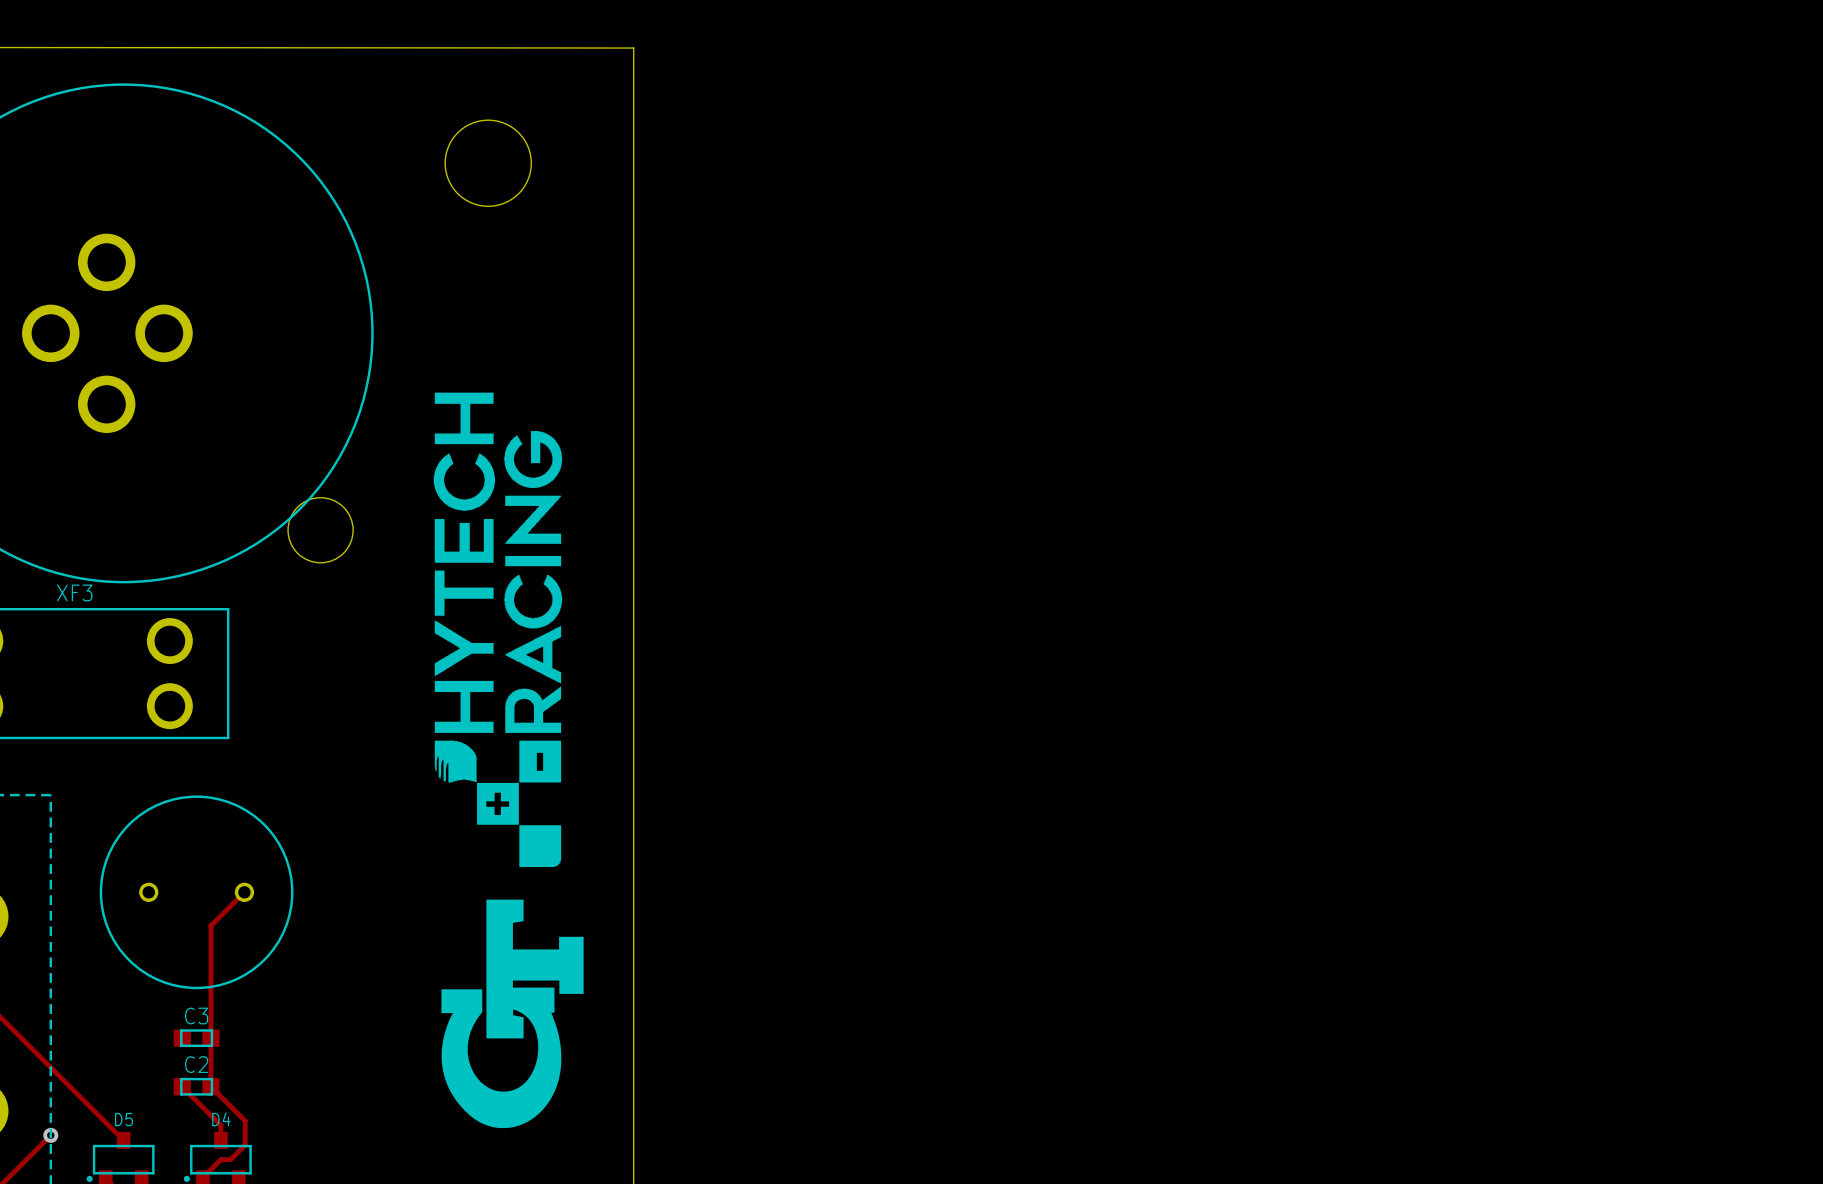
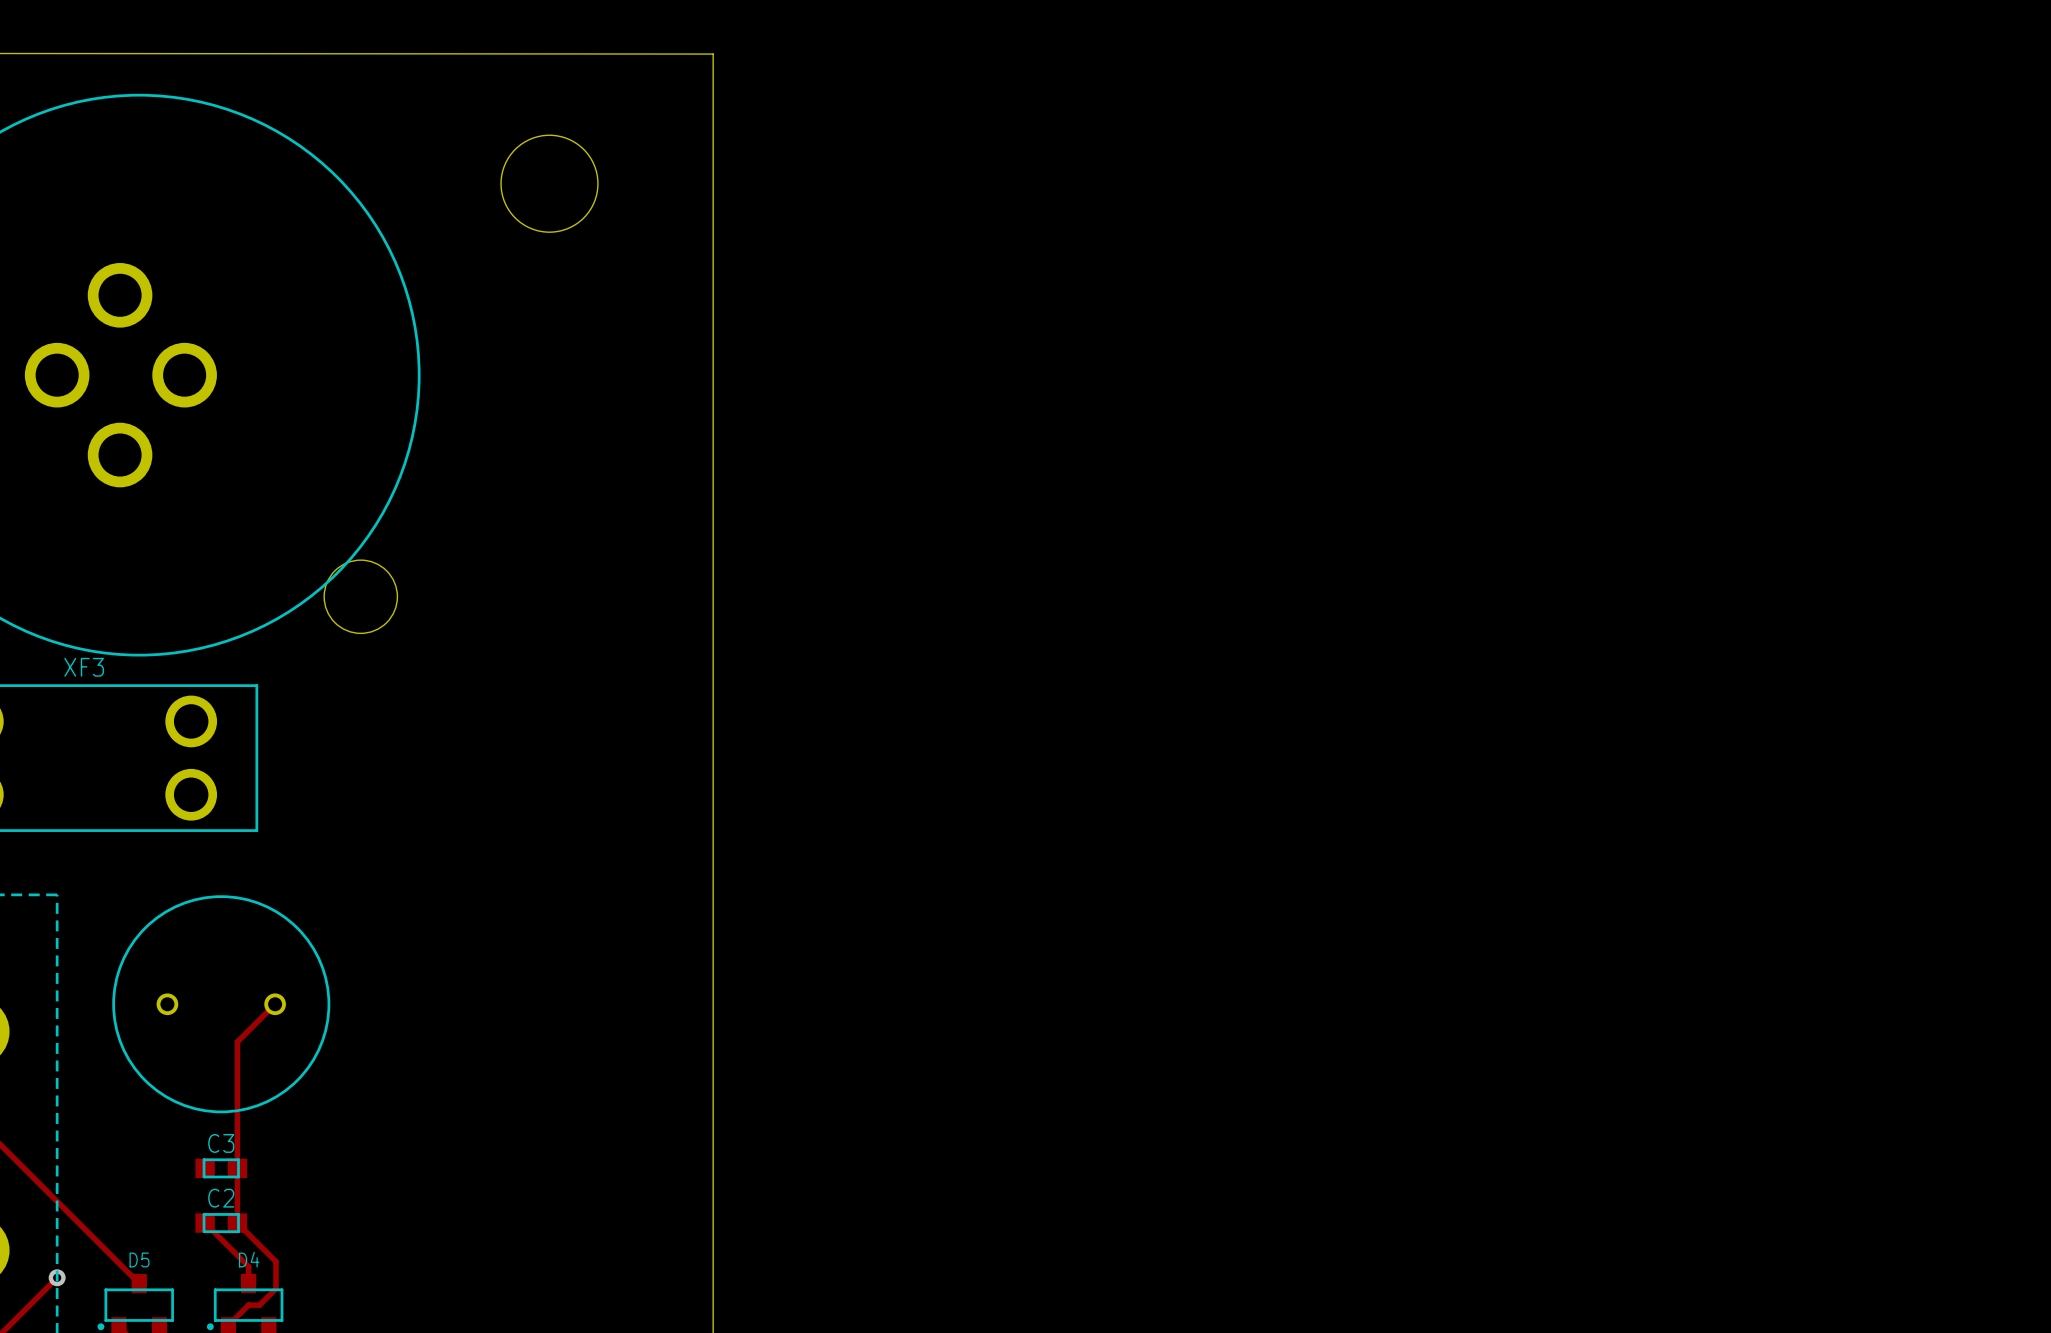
drawing: [433, 392, 563, 868] -> none
drawing: [441, 899, 584, 1129] -> none

